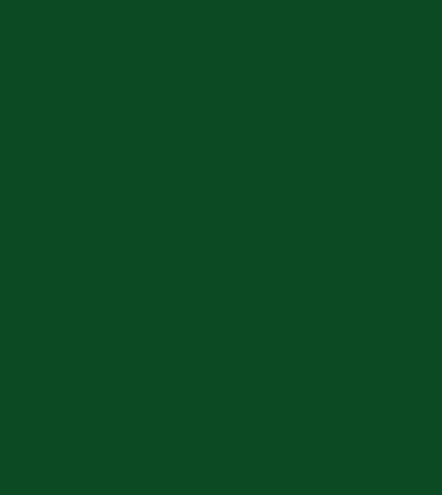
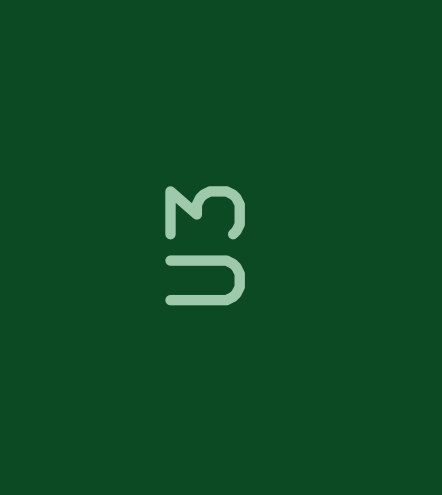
U3: none -> (205, 245)

